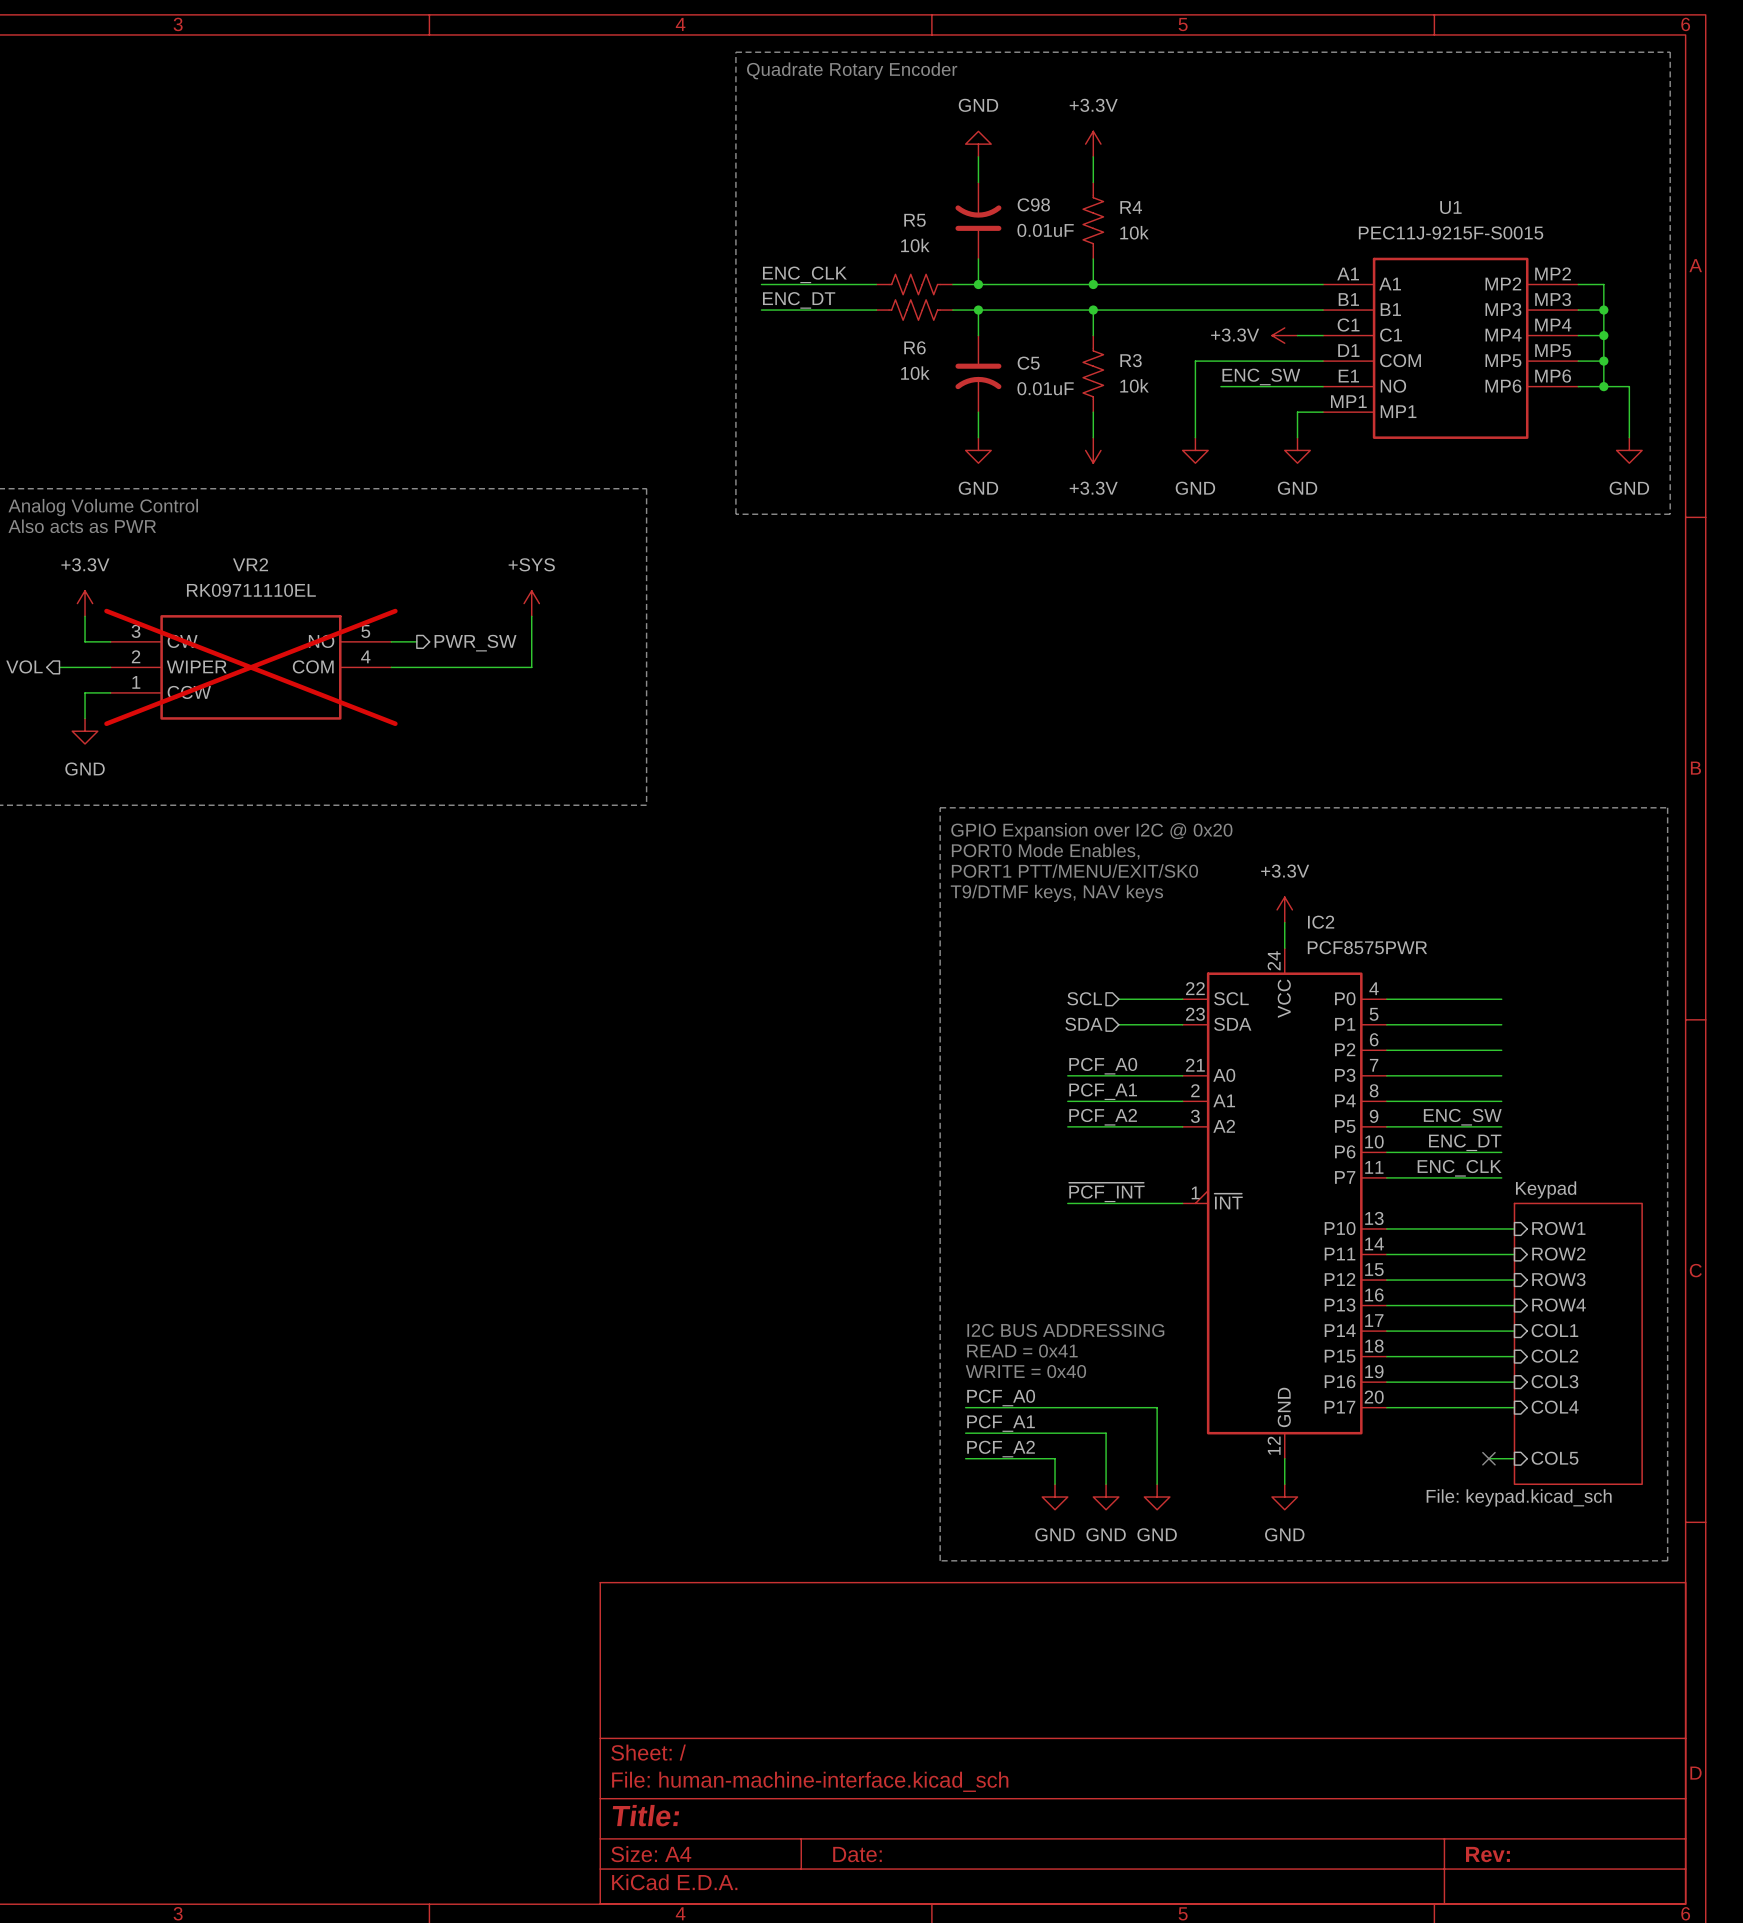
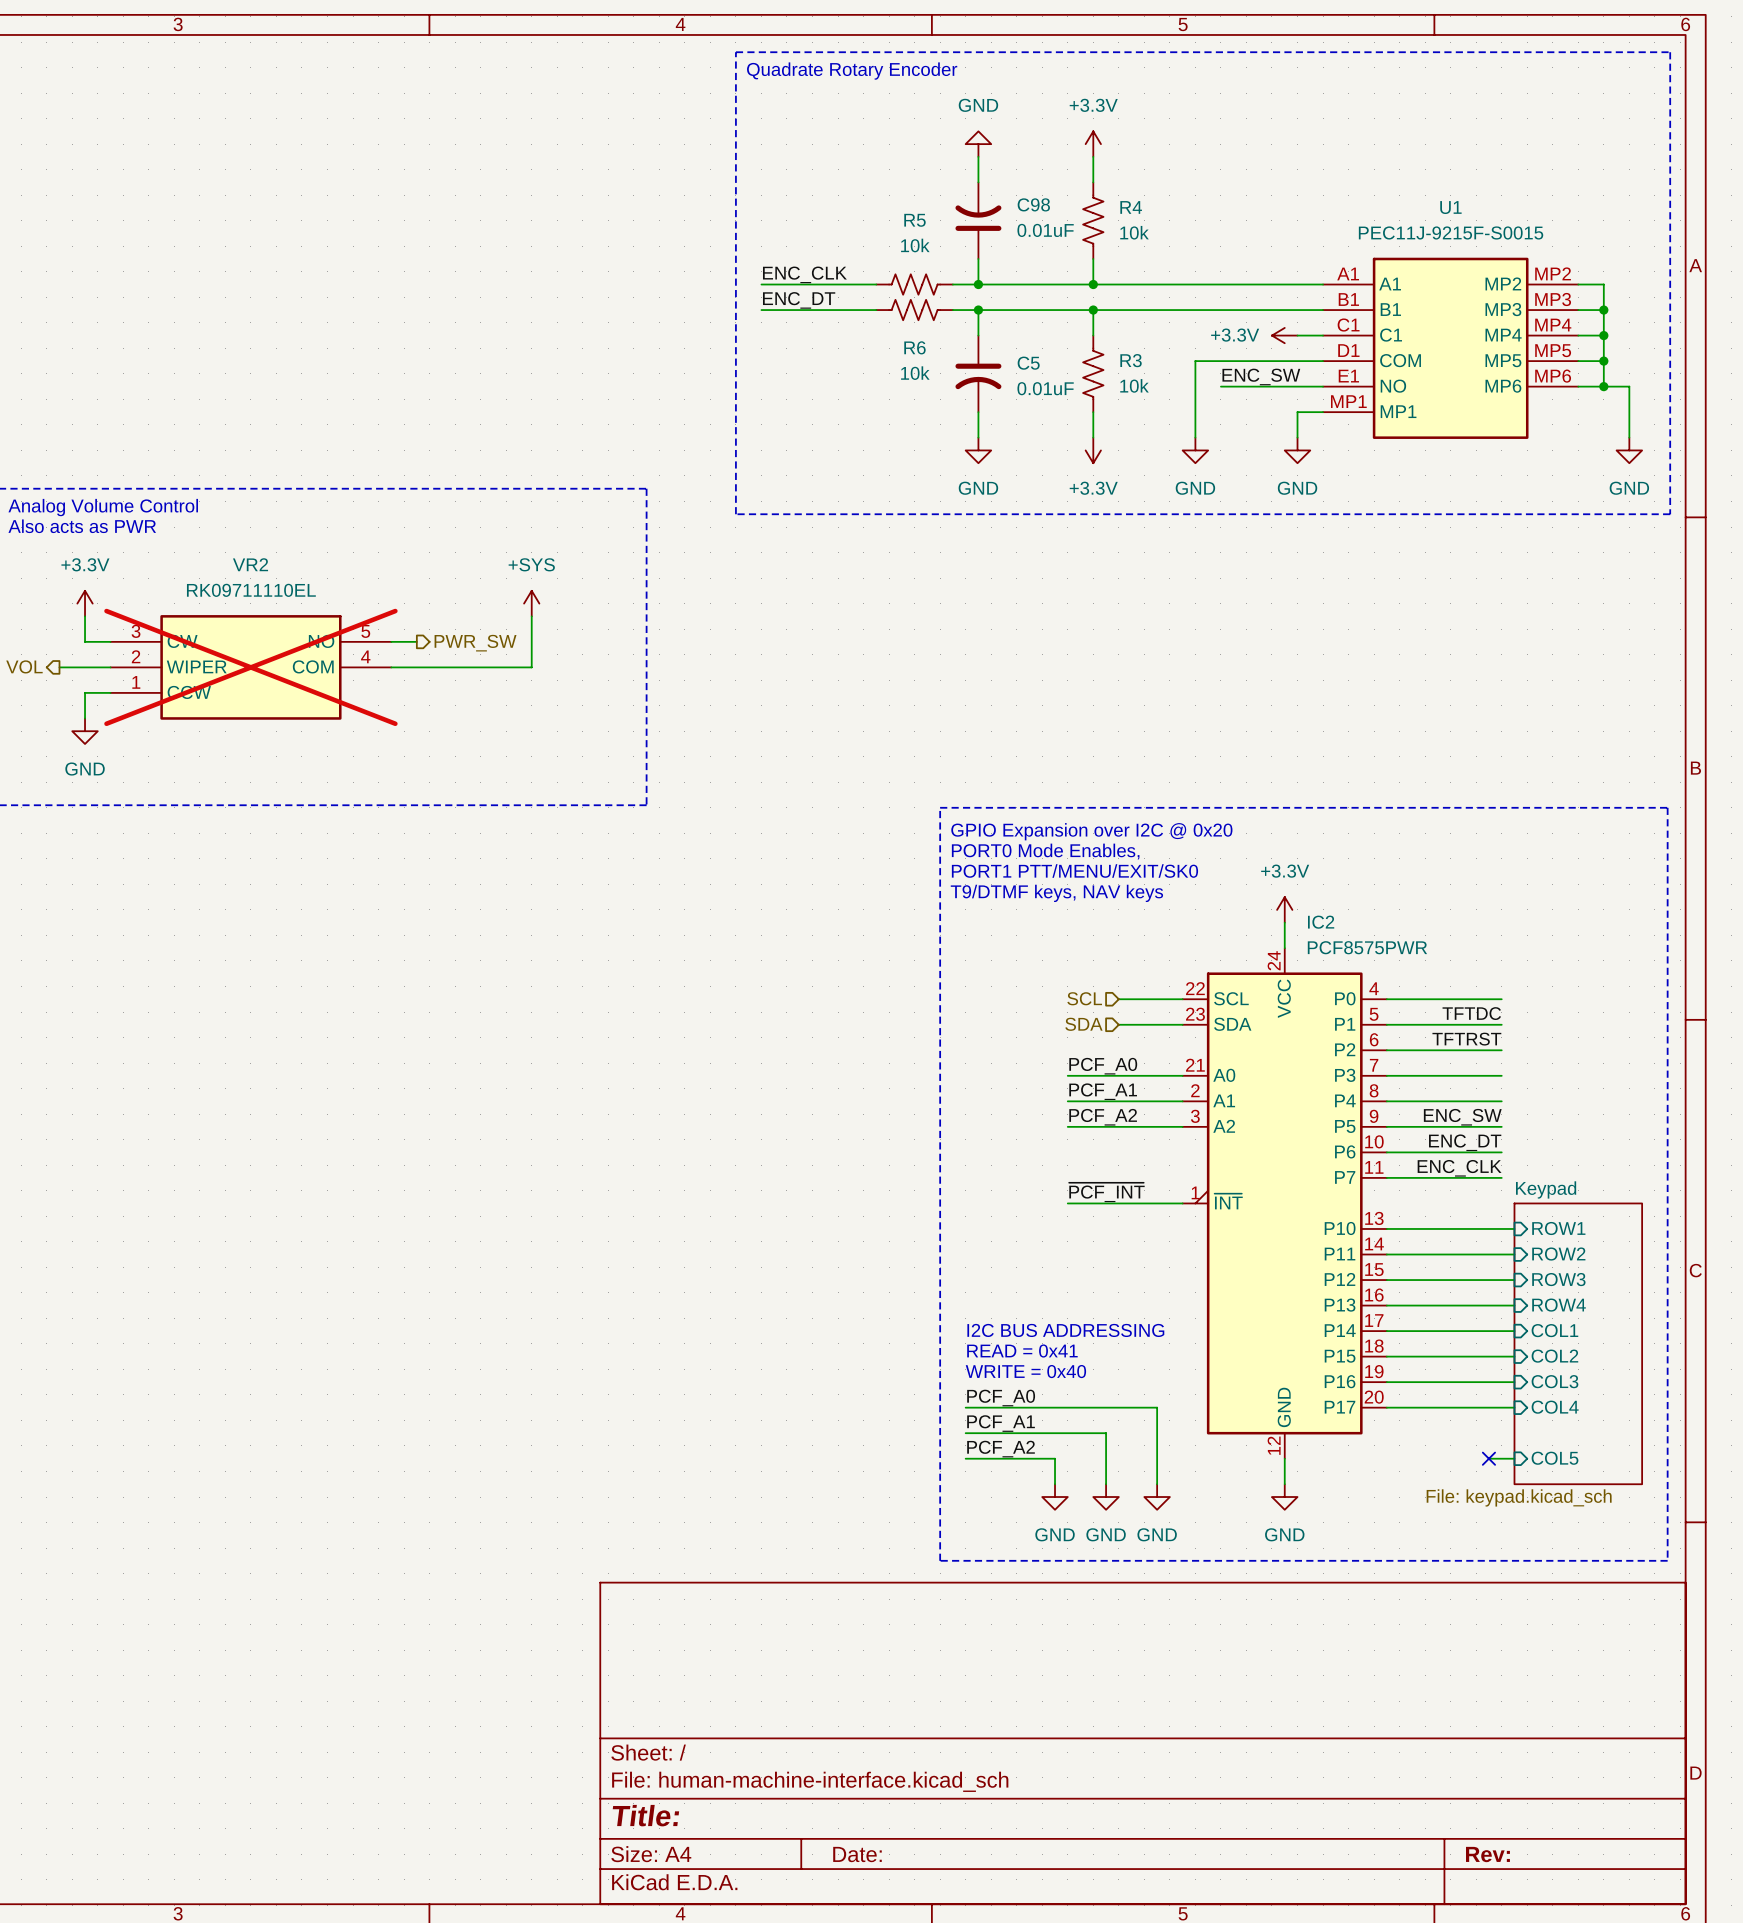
label: none -> TFTDC (1471, 1013)
label: none -> TFTRST (1466, 1039)

